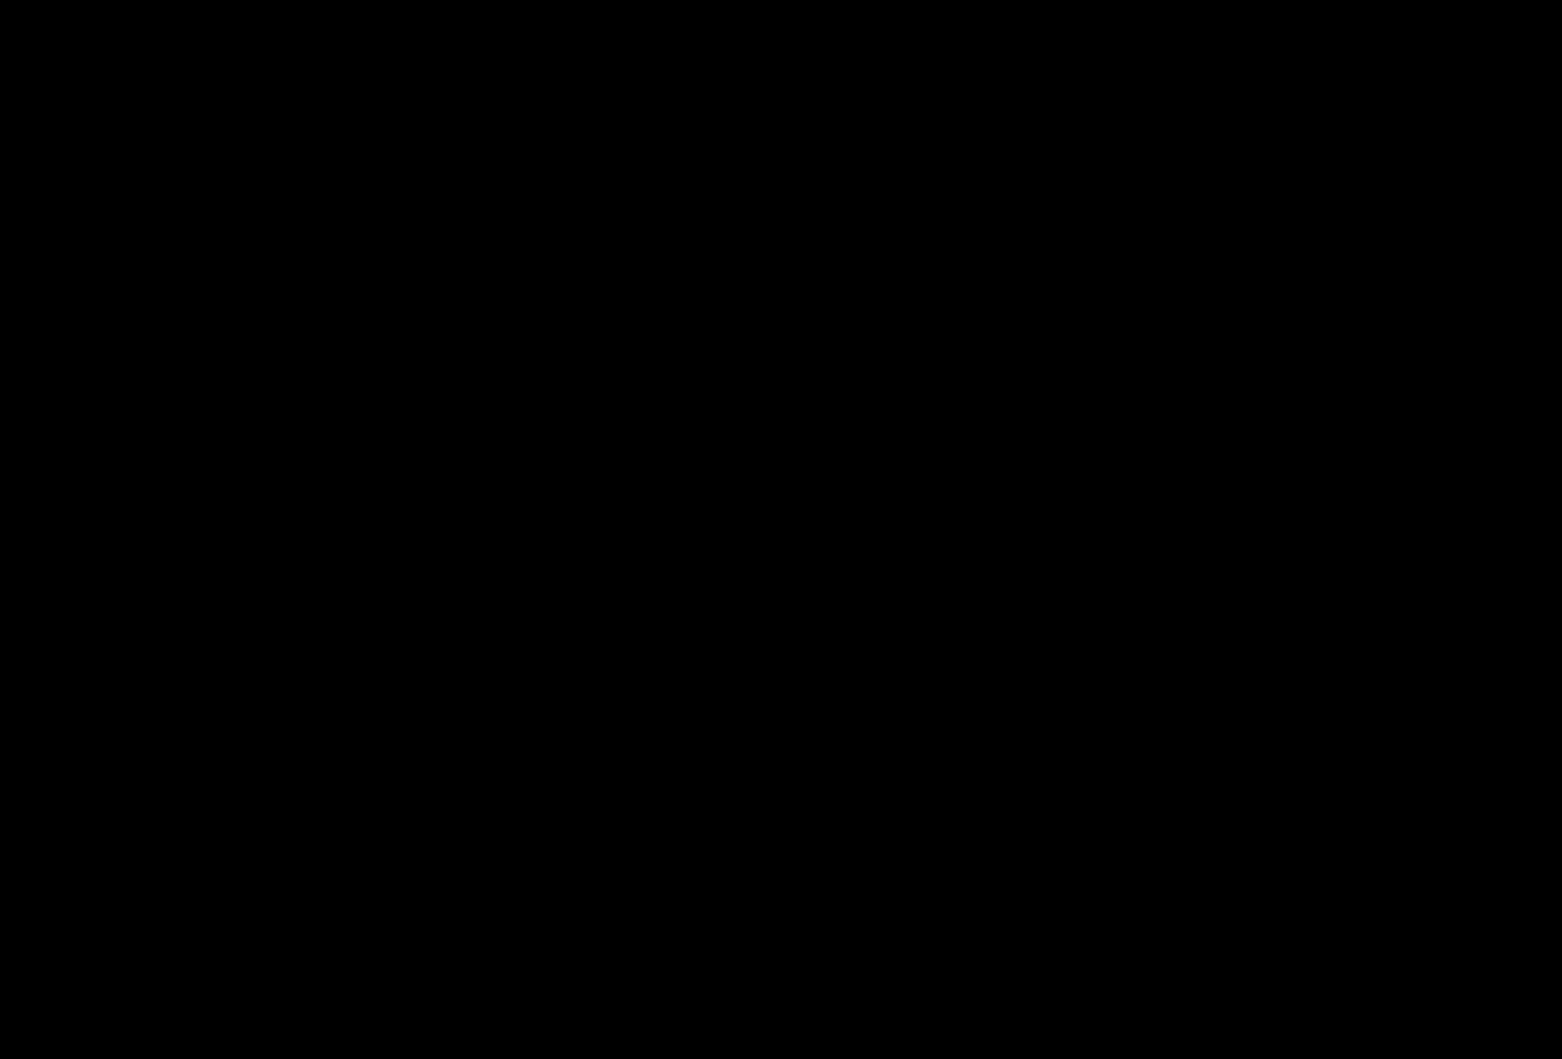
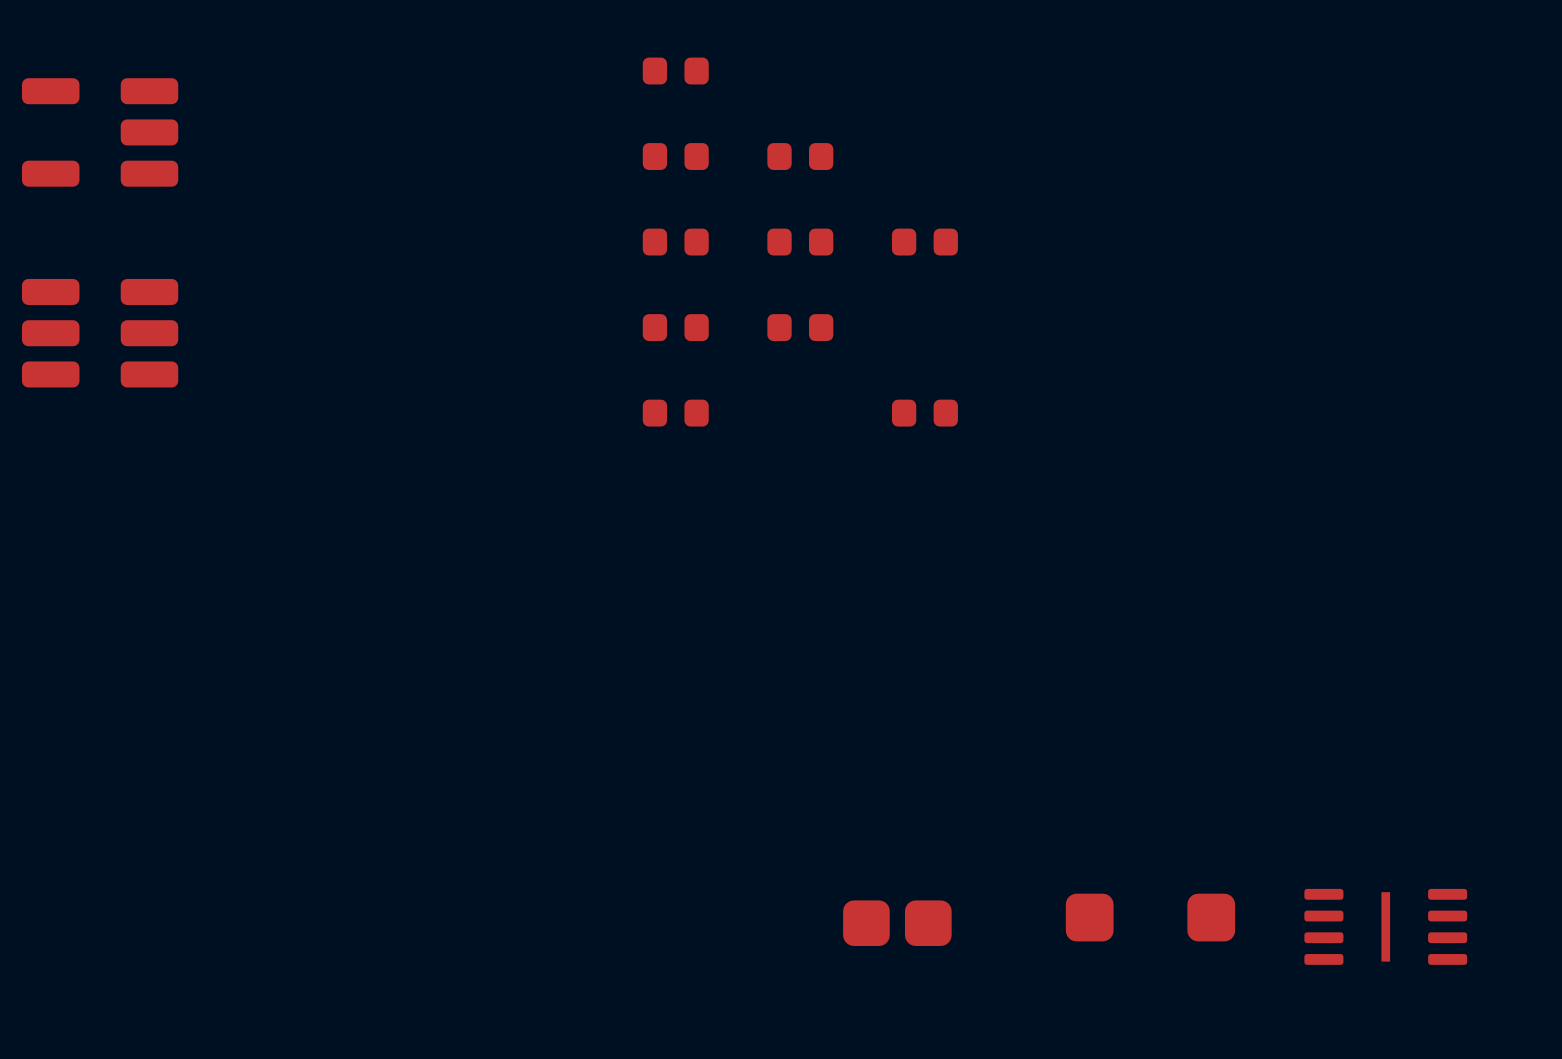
part: none -> (675, 71)
part: none -> (100, 132)
part: none -> (675, 156)
part: none -> (800, 156)
part: none -> (675, 242)
part: none -> (800, 242)
part: none -> (924, 242)
part: none -> (675, 327)
part: none -> (800, 327)
part: none -> (100, 333)
part: none -> (675, 413)
part: none -> (924, 413)
part: none -> (1150, 917)
part: none -> (897, 923)
part: none -> (1385, 926)

